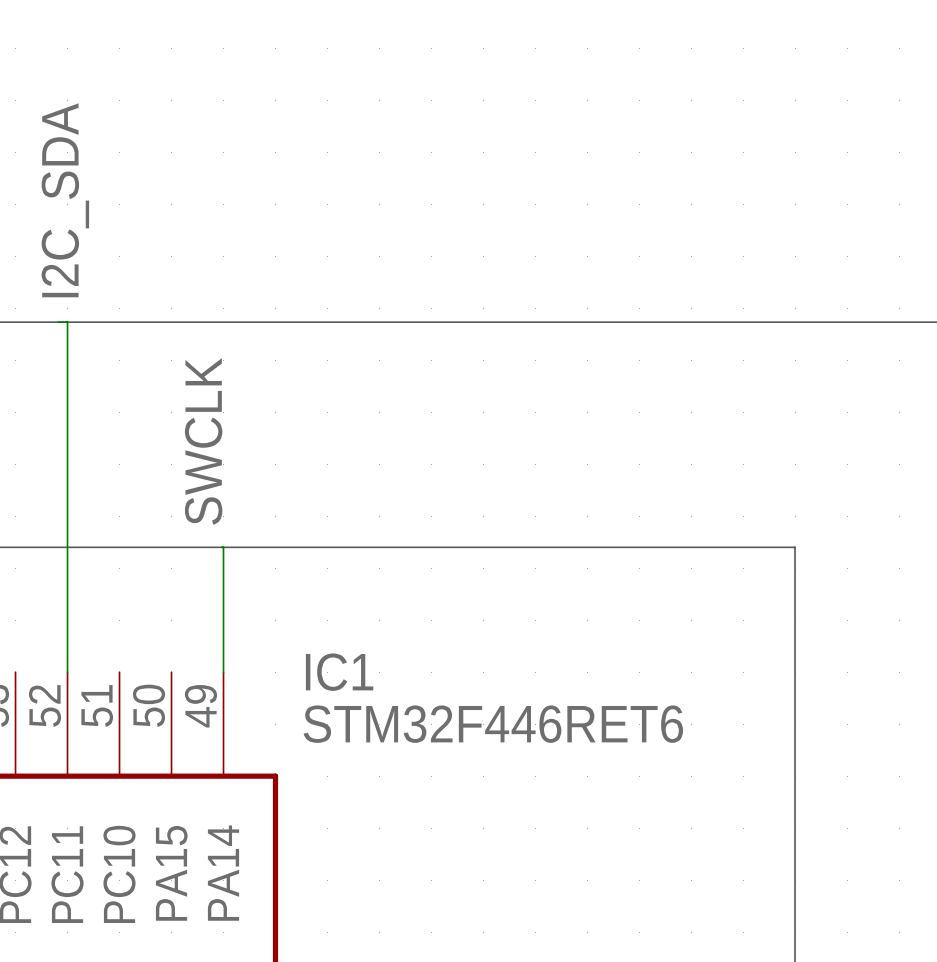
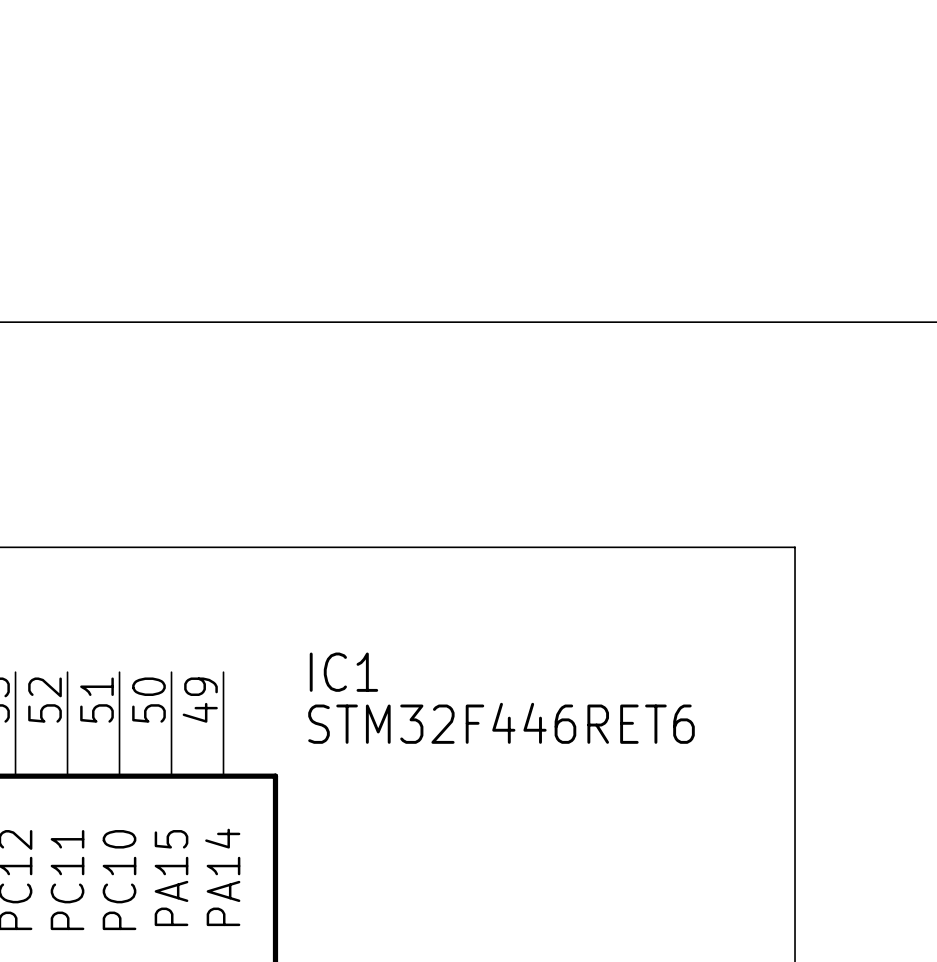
label: I2C_SDA (65, 200) -> none
wire: (58, 322) (67, 322) (67, 672) -> none
label: SWCLK (203, 441) -> none
wire: (221, 547) (223, 547) (223, 672) -> none

